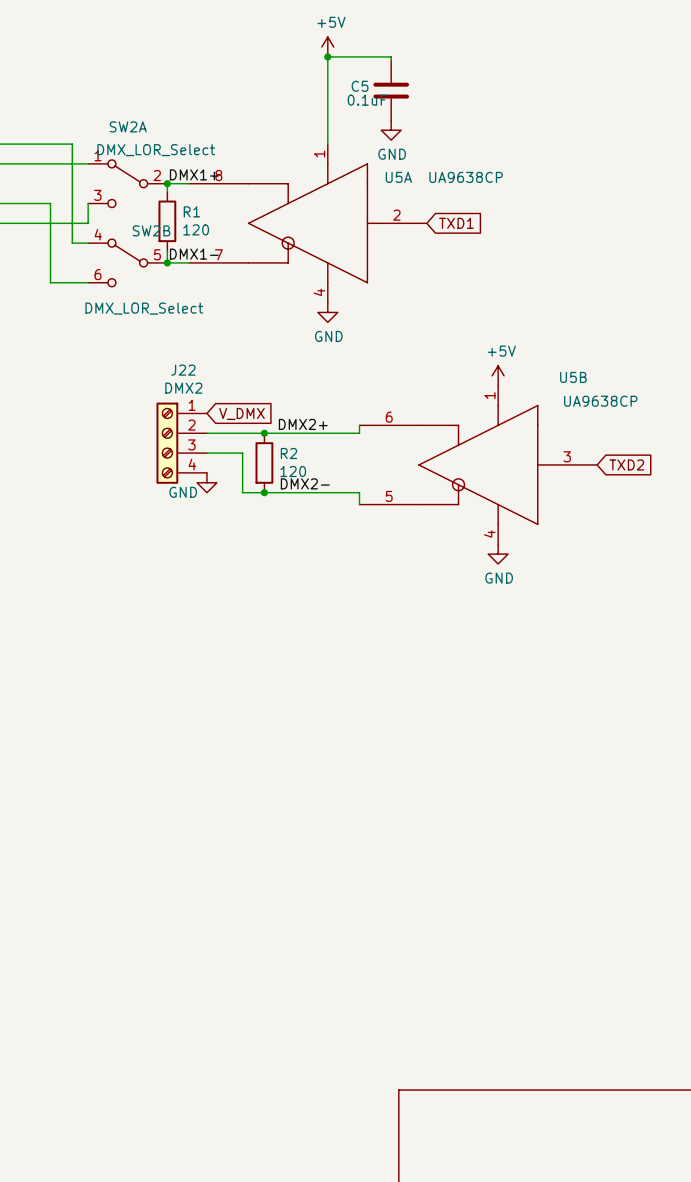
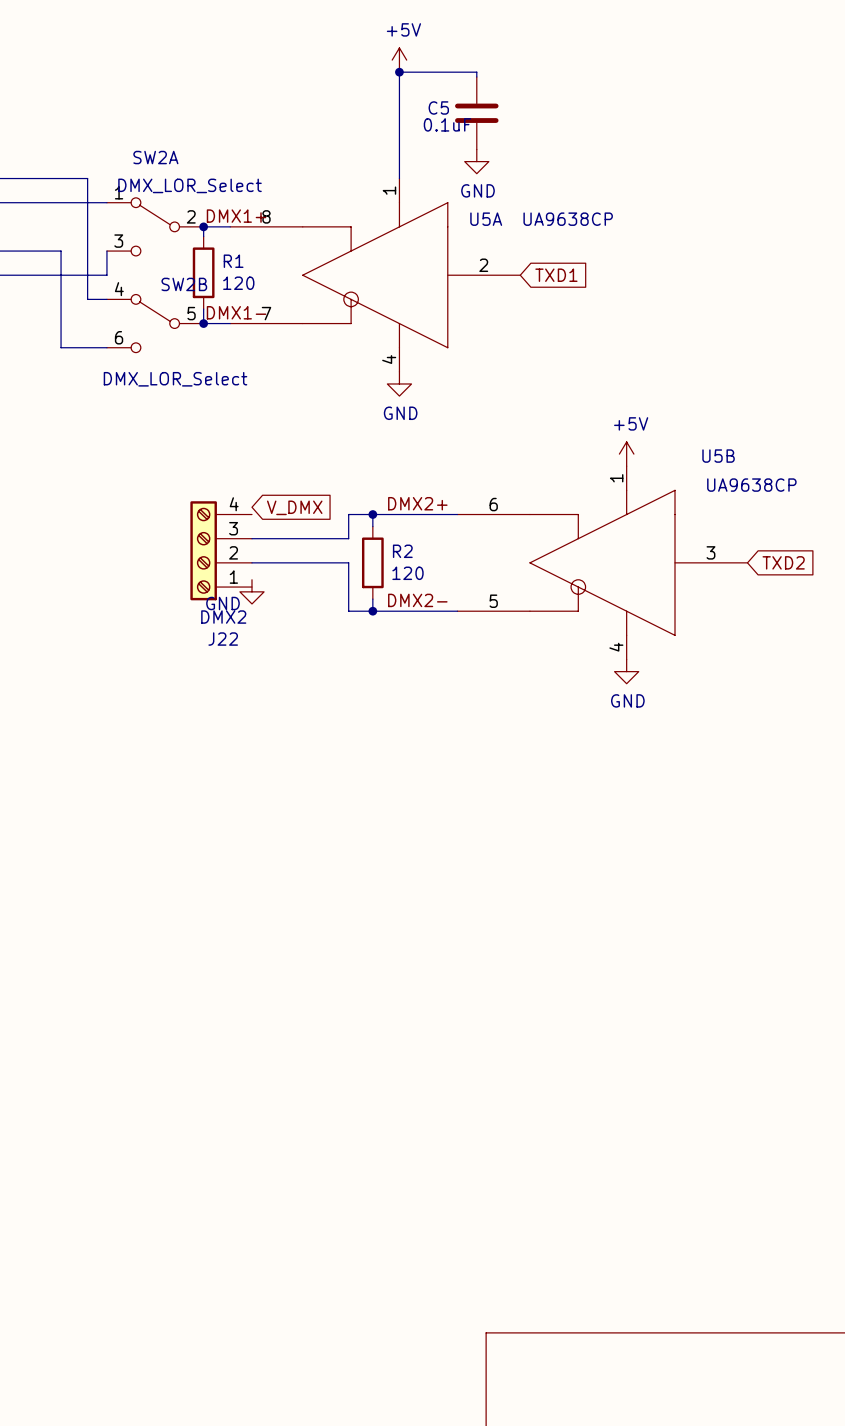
power symbol position: +5V (498, 375) -> +5V (626, 454)
wire: none -> (372, 514) (372, 526)
junction: none -> (372, 514)
wire: none -> (457, 514) (348, 514) (348, 538) (251, 538)
label position: DMX2+ (303, 424) -> DMX2+ (417, 503)
wire: (359, 425) (359, 433) (206, 433) -> none
junction: (264, 433) -> none
J22 flip: as is (167, 443) -> up-down (203, 550)
wire: (206, 453) (242, 453) (242, 492) (359, 492) (359, 504) -> none
wire: none -> (251, 562) (348, 562) (348, 611) (457, 611)
R2 position: (264, 462) -> (372, 562)
U5B position: (478, 464) -> (602, 562)
global label position: TXD2 (626, 464) -> TXD2 (783, 562)
label position: DMX2- (305, 483) -> DMX2- (417, 600)
wire: none -> (372, 599) (372, 611)
junction: (264, 492) -> none
junction: none -> (372, 611)
power symbol position: GND (498, 554) -> GND (626, 671)

